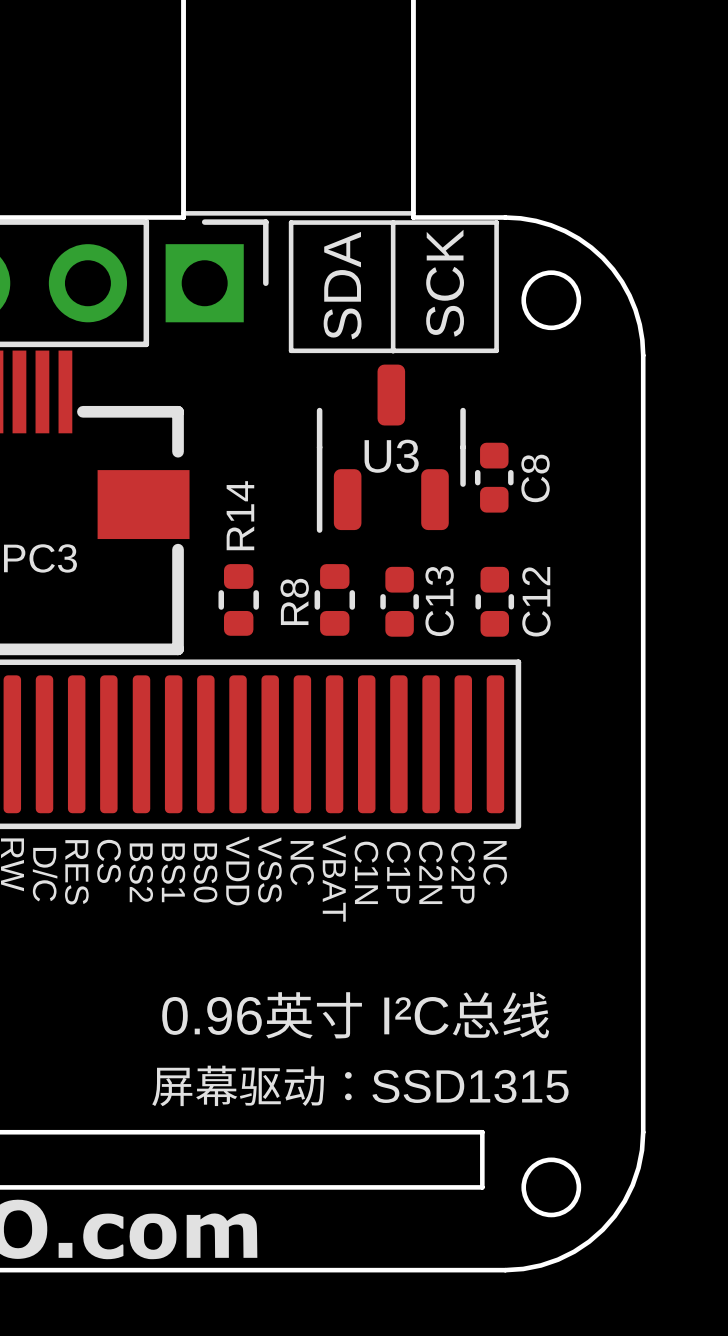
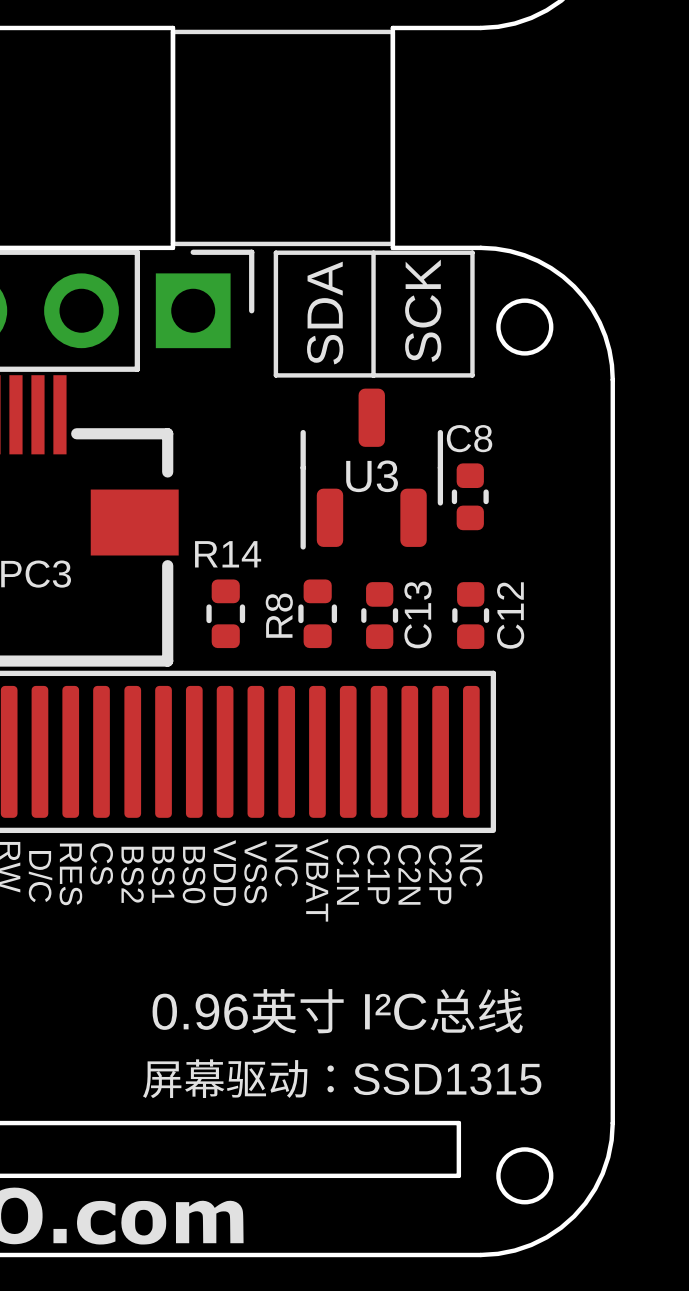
C8 name rotation: 0° (535, 478) -> 90° clockwise (469, 438)
C8 name position: C8 (535, 478) -> C8 (469, 438)
R14 name rotation: 0° (240, 515) -> 90° clockwise (228, 554)

